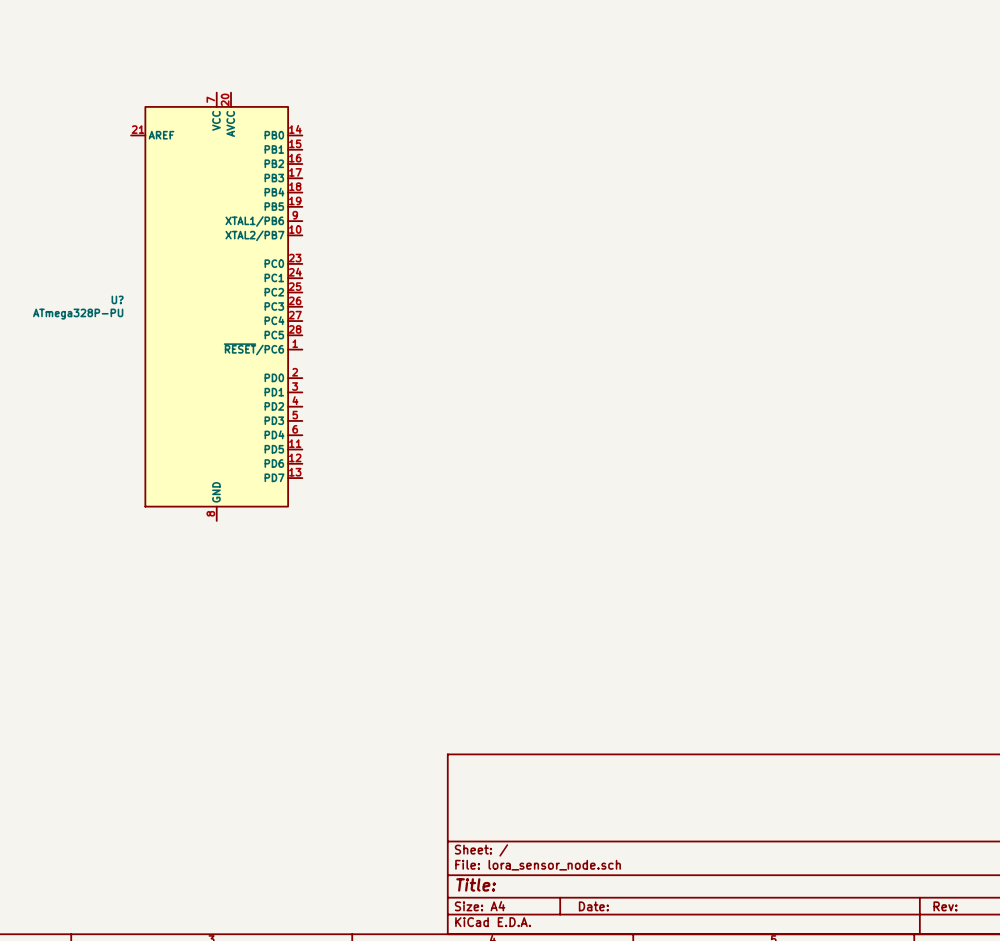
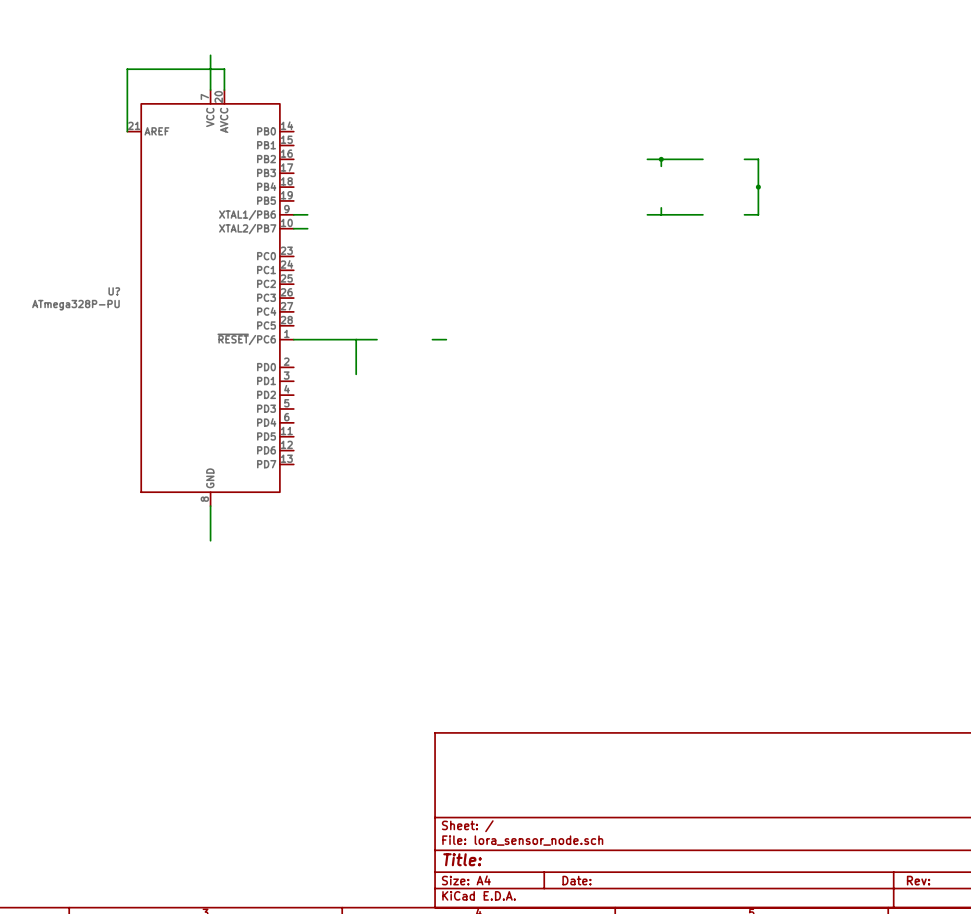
wire: none -> (210, 55) (210, 90)
wire: none -> (224, 90) (224, 69) (127, 69) (127, 131)
wire: none -> (647, 159) (702, 159)
wire: none -> (661, 159) (661, 166)
junction: none -> (661, 159)
wire: none -> (744, 159) (758, 159) (758, 214) (744, 214)
junction: none -> (758, 187)
wire: none -> (661, 207) (661, 214)
wire: none -> (293, 214) (307, 214)
wire: none -> (647, 214) (702, 214)
wire: none -> (293, 228) (307, 228)
wire: none -> (293, 339) (376, 339)
wire: none -> (356, 339) (356, 374)
wire: none -> (432, 339) (446, 339)
wire: none -> (210, 506) (210, 540)

